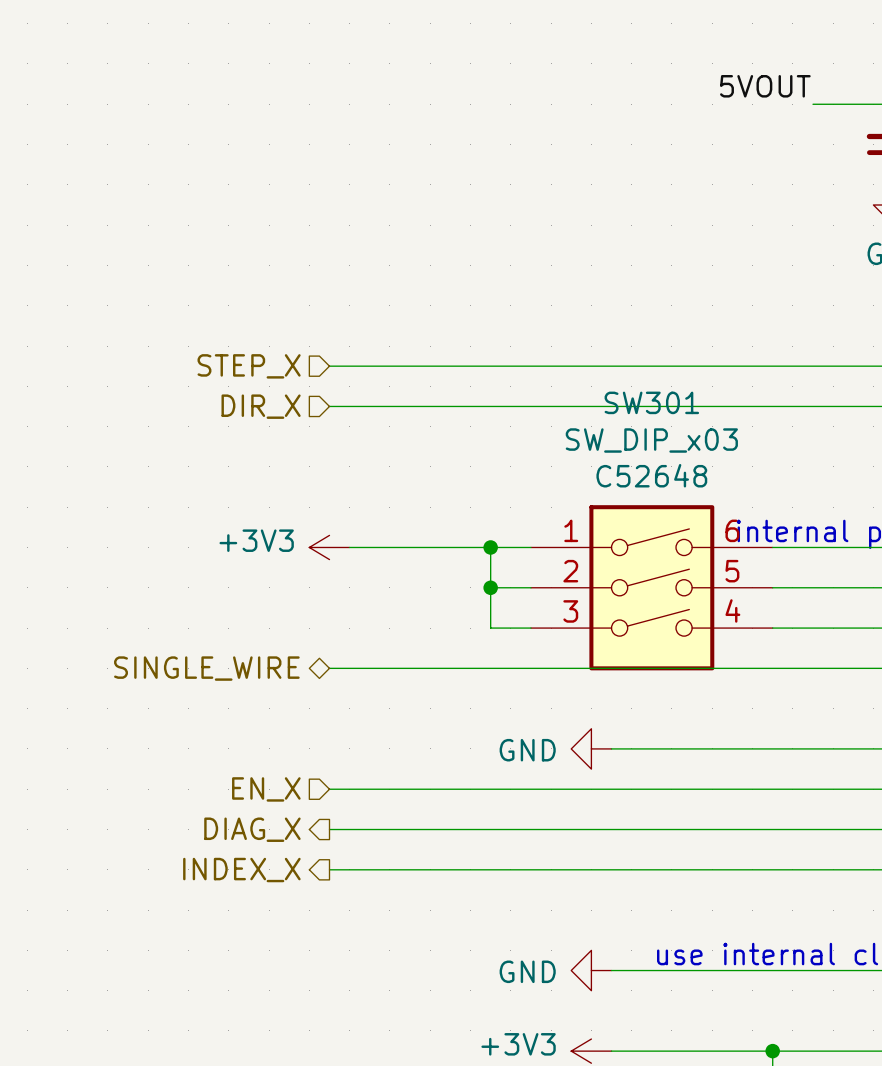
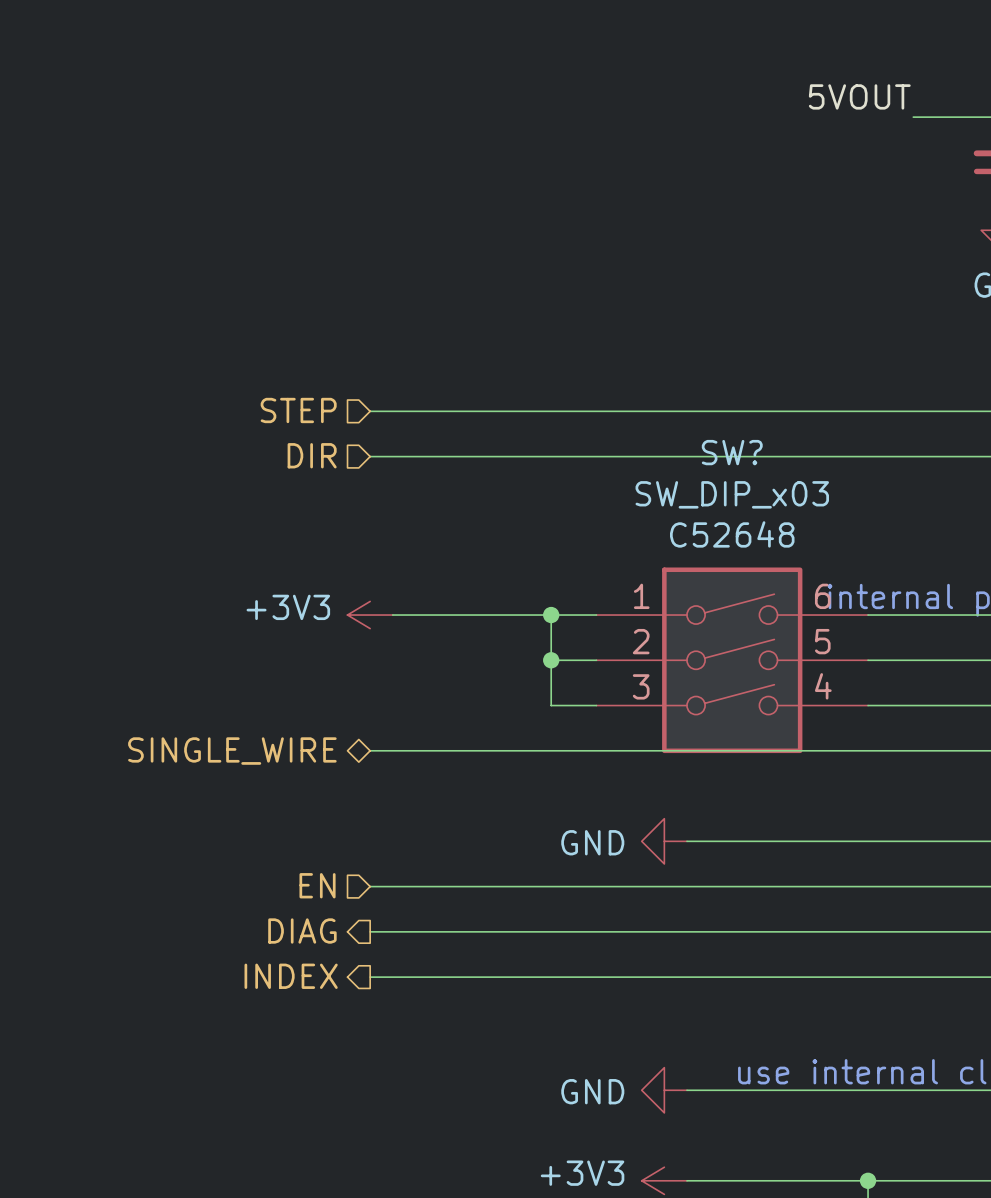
hierarchical label: STEP_X (249, 366) -> STEP (298, 410)
SW301 name: SW301 (651, 402) -> SW? (732, 452)
hierarchical label: DIR_X (261, 406) -> DIR (312, 455)
hierarchical label: EN_X (266, 789) -> EN (317, 885)
hierarchical label: DIAG_X (252, 829) -> DIAG (302, 931)
hierarchical label: INDEX_X (241, 870) -> INDEX (291, 976)

